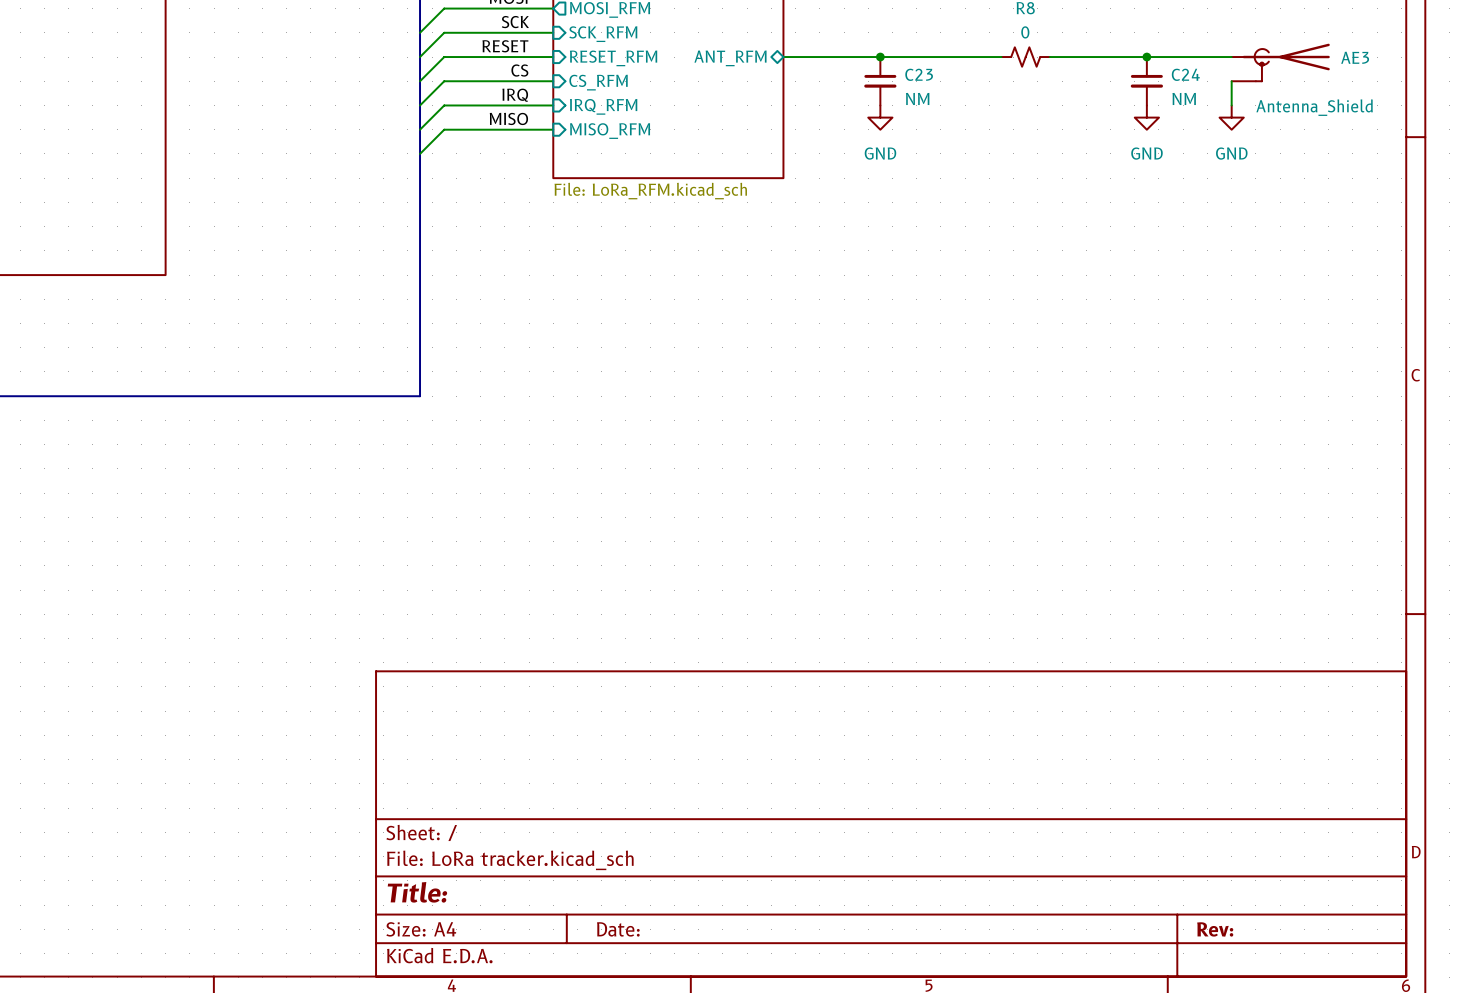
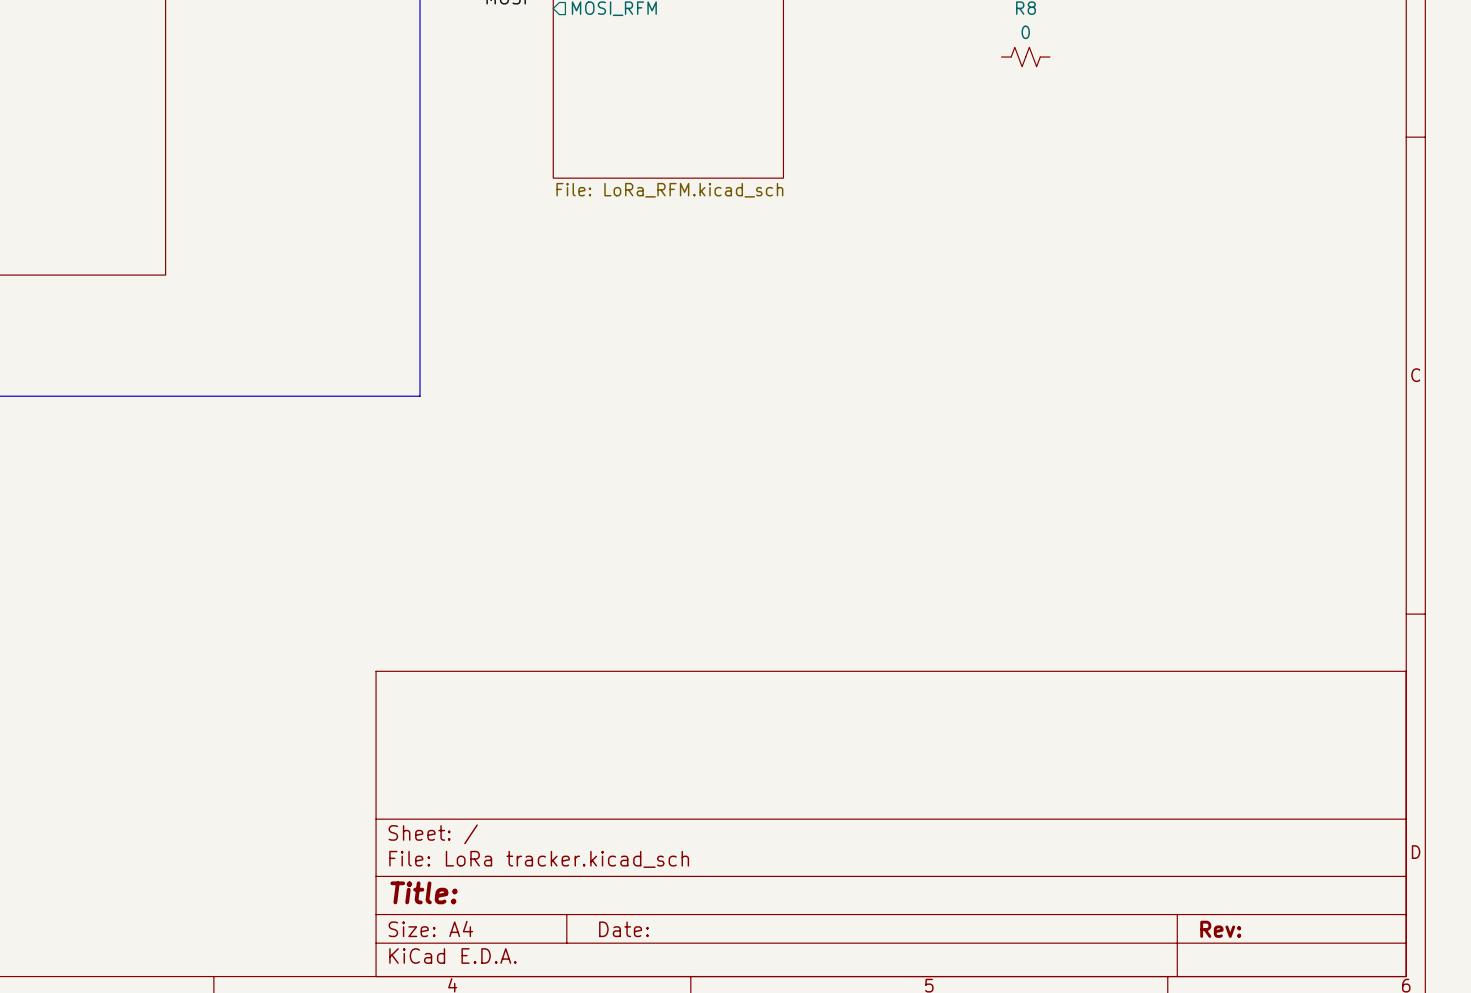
wire: (553, 8) (444, 8) (420, 32) -> none
label: SCK (515, 22) -> none
wire: (553, 32) (444, 32) (420, 57) -> none
sheet pin: SCK_RFM (603, 34) -> none
label: RESET (505, 46) -> none
wire: (553, 57) (444, 57) (420, 81) -> none
wire: (783, 57) (1001, 57) -> none
junction: (880, 57) -> none
wire: (1049, 57) (1231, 57) -> none
junction: (1146, 57) -> none
sheet pin: RESET_RFM (613, 58) -> none
sheet pin: ANT_RFM (730, 58) -> none
AE3: Antenna_Shield (1280, 62) -> none
label: CS (519, 70) -> none
wire: (553, 81) (444, 81) (420, 105) -> none
C23: NM (880, 81) -> none
C24: NM (1146, 81) -> none
wire: (1231, 81) (1231, 105) -> none
sheet pin: CS_RFM (598, 82) -> none
label: IRQ (515, 95) -> none
wire: (553, 105) (444, 105) (420, 129) -> none
sheet pin: IRQ_RFM (603, 106) -> none
power symbol: GND (880, 117) -> none
power symbol: GND (1146, 117) -> none
power symbol: GND (1231, 117) -> none
label: MISO (508, 118) -> none
wire: (553, 129) (444, 129) (420, 153) -> none
sheet pin: MISO_RFM (610, 131) -> none

